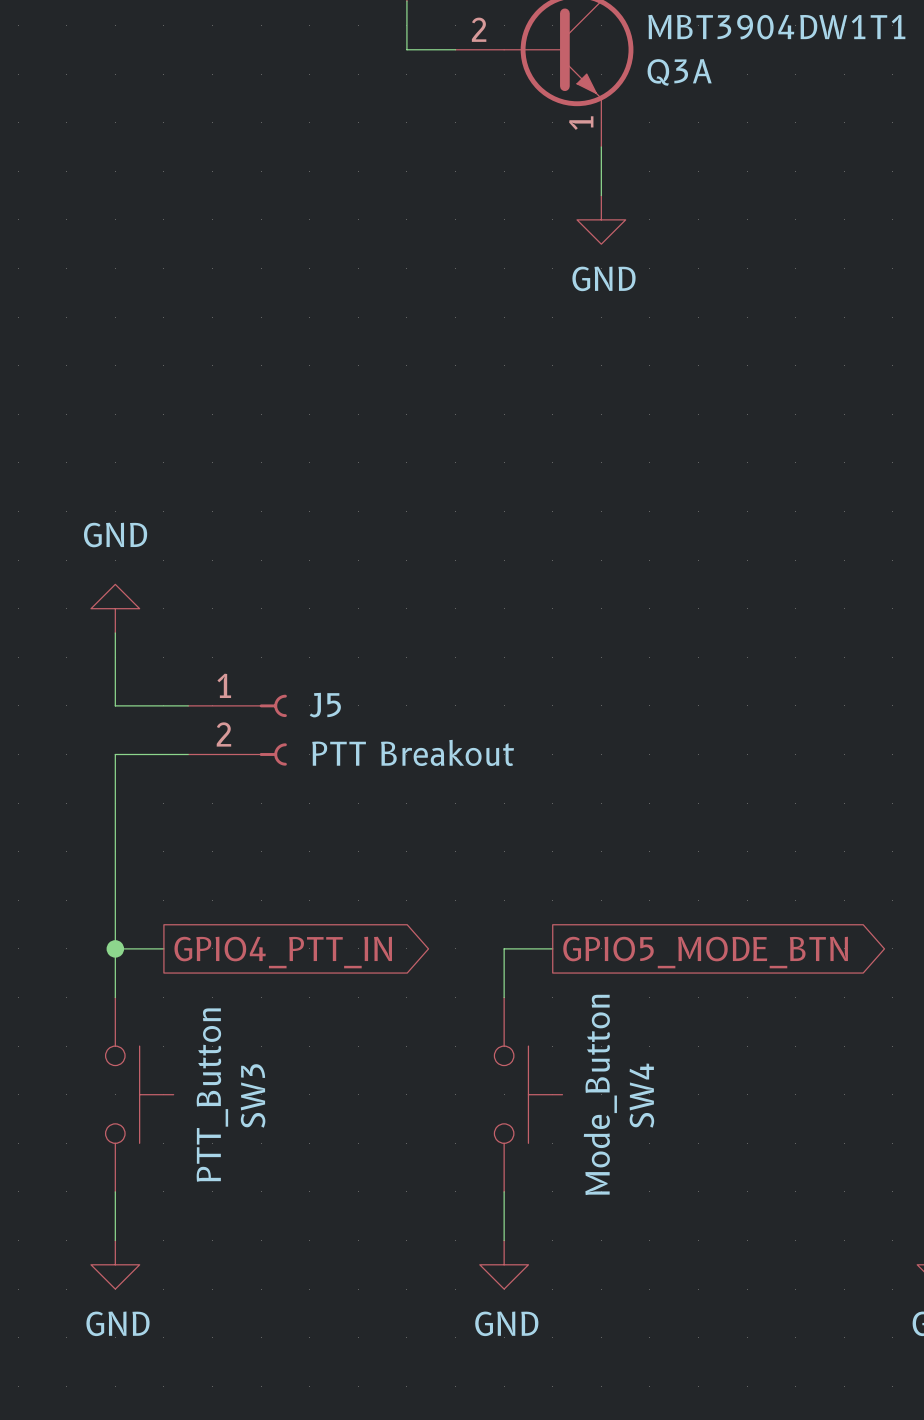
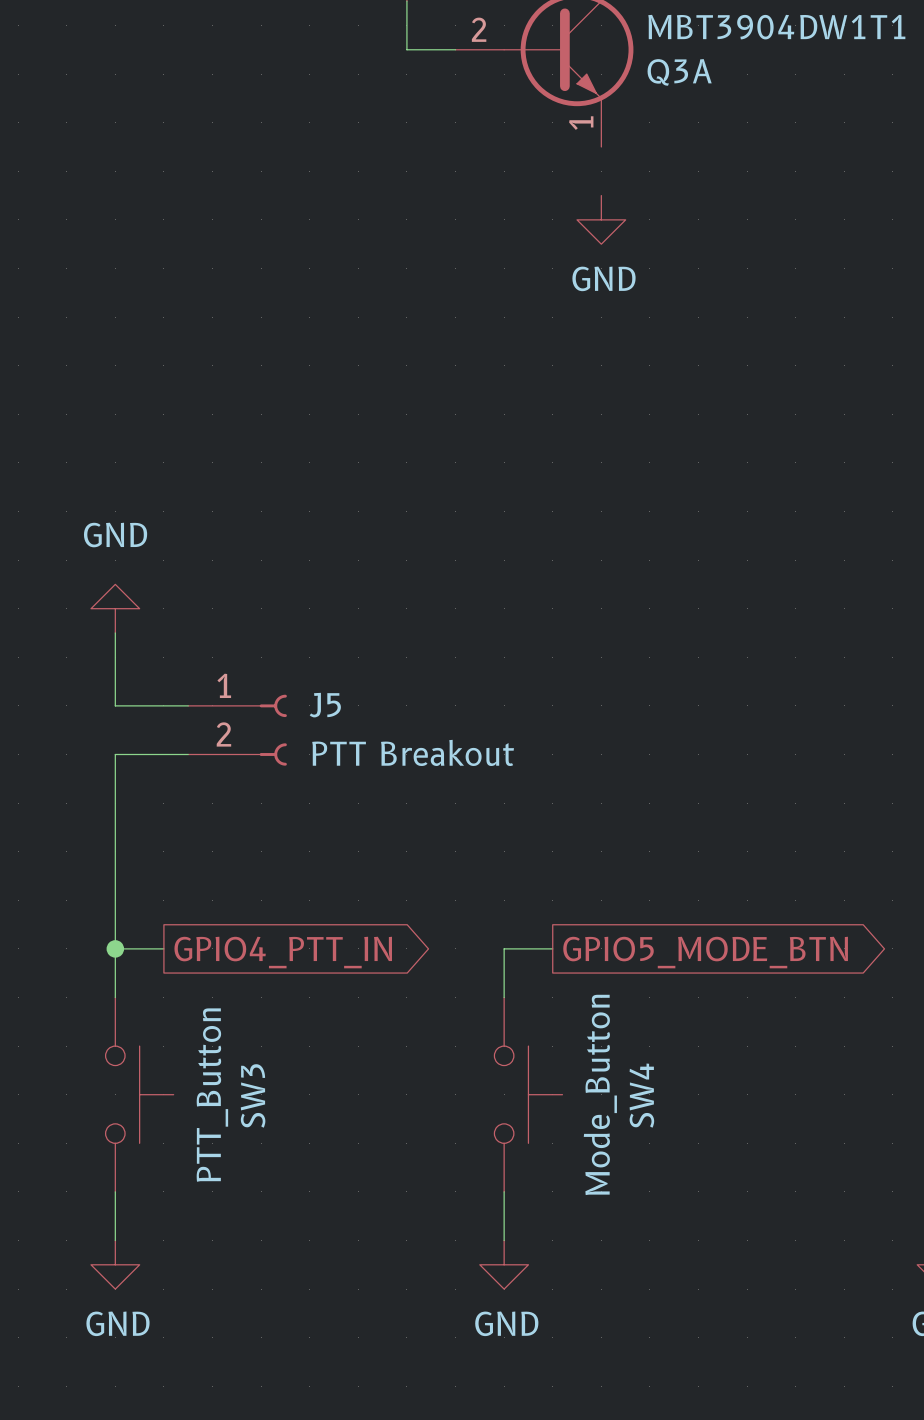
wire: (601, 146) (601, 195) -> none

